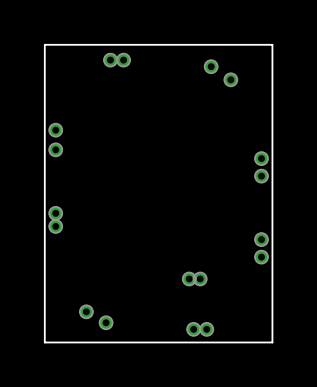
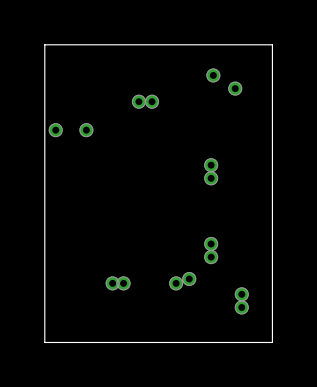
part: (110, 60) -> none
part: (123, 60) -> none
part: (211, 66) -> none
part: none -> (213, 75)
part: (230, 79) -> none
part: none -> (235, 88)
part: none -> (138, 101)
part: none -> (152, 101)
part position: (55, 149) -> (86, 130)
part: (261, 158) -> none
part: none -> (211, 165)
part: (261, 176) -> none
part: none -> (211, 178)
part: (55, 213) -> none
part: (55, 226) -> none
part: (261, 239) -> none
part: none -> (211, 243)
part: none -> (211, 257)
part: (261, 257) -> none
part: (200, 279) -> none
part: none -> (112, 283)
part: none -> (123, 283)
part: none -> (176, 283)
part: none -> (241, 294)
part: none -> (241, 307)
part: (86, 311) -> none
part: (106, 322) -> none
part: (193, 329) -> none
part: (206, 329) -> none

